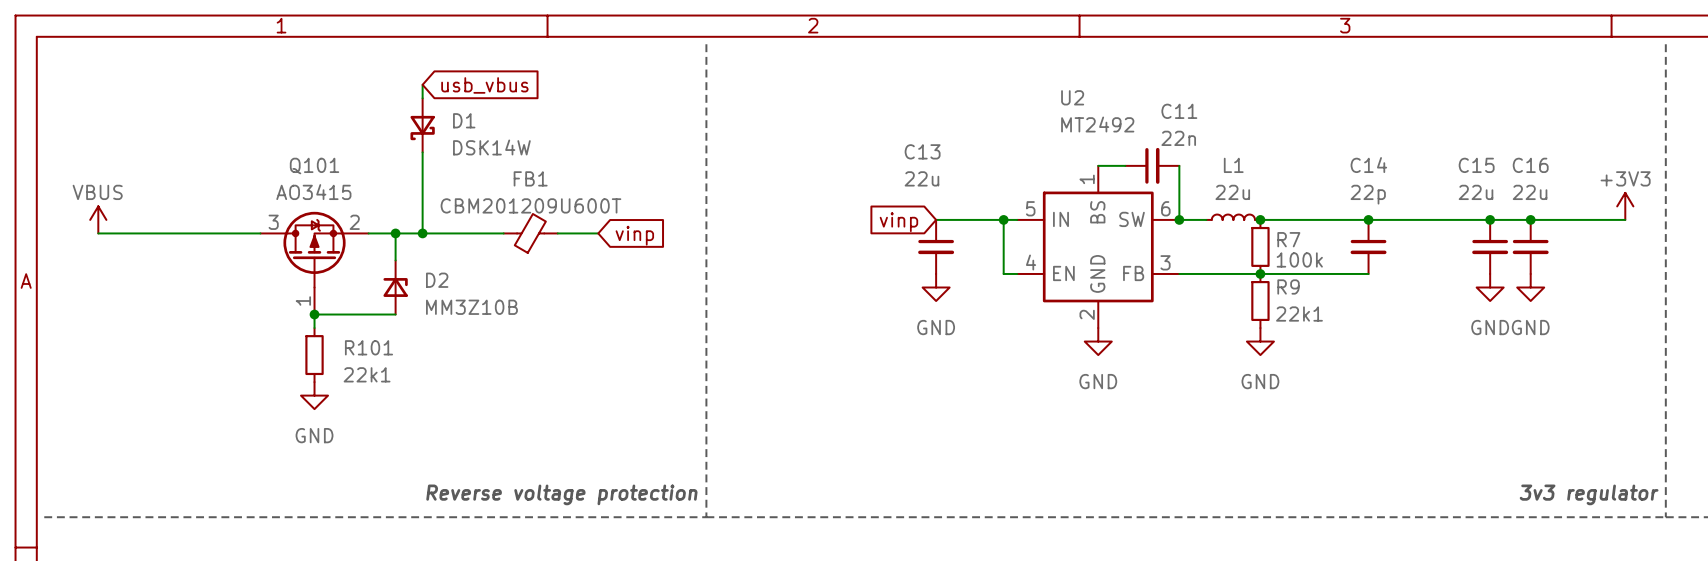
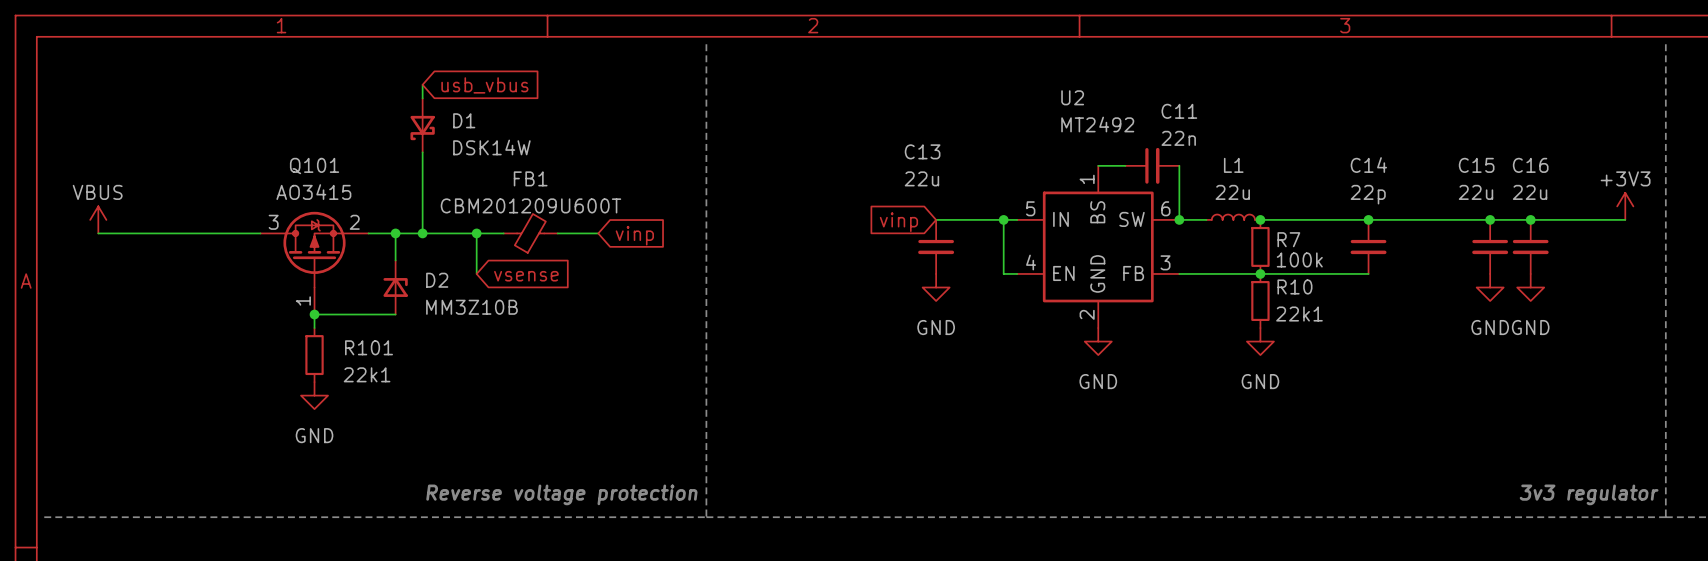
wire: none -> (476, 233) (476, 273)
junction: none -> (476, 233)
global label: none -> vsense (526, 276)
R9 name: R9 (1288, 286) -> R10 (1294, 286)

